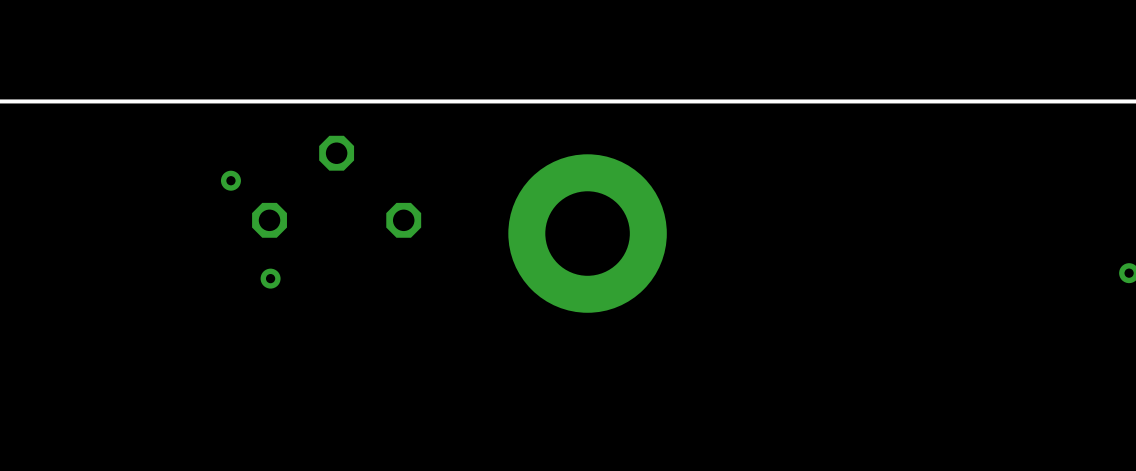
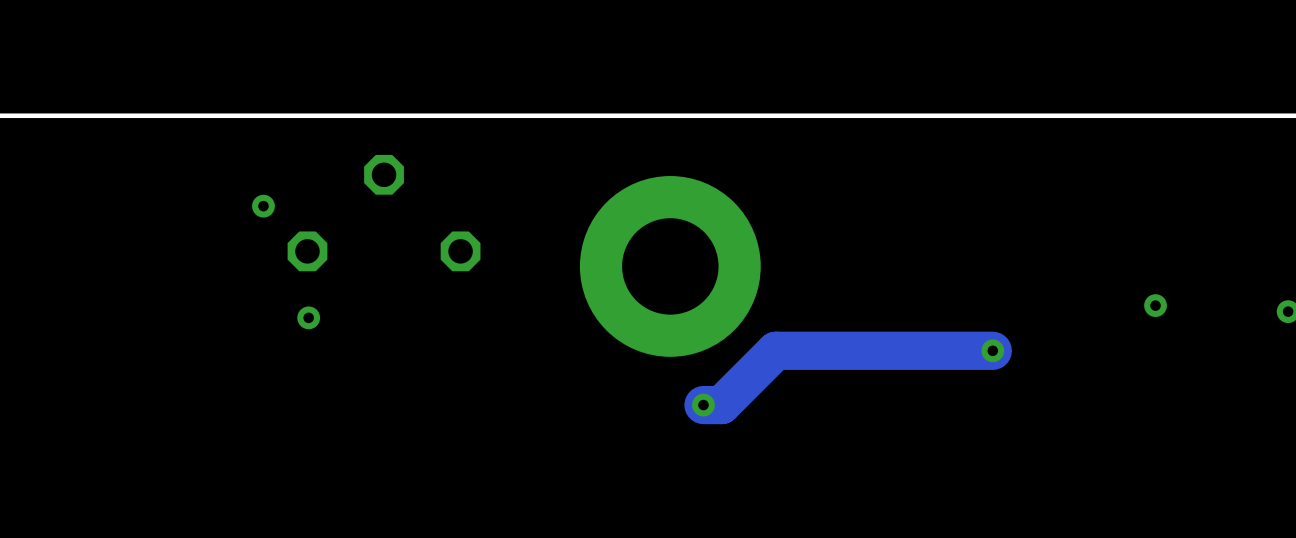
via: none -> (1155, 305)
track: none -> (992, 350) (775, 350) (721, 405) (703, 405)
via: none -> (992, 350)
via: none -> (703, 405)

